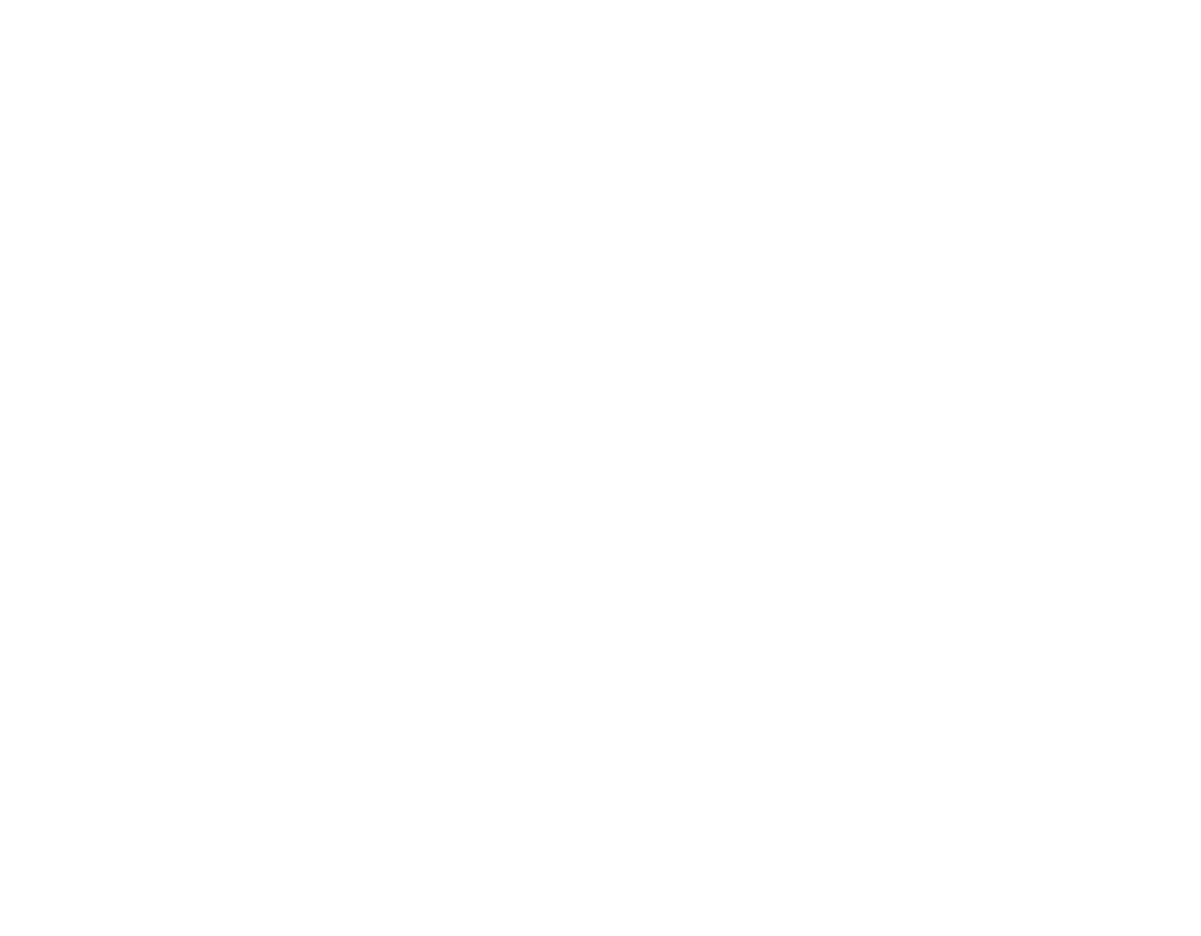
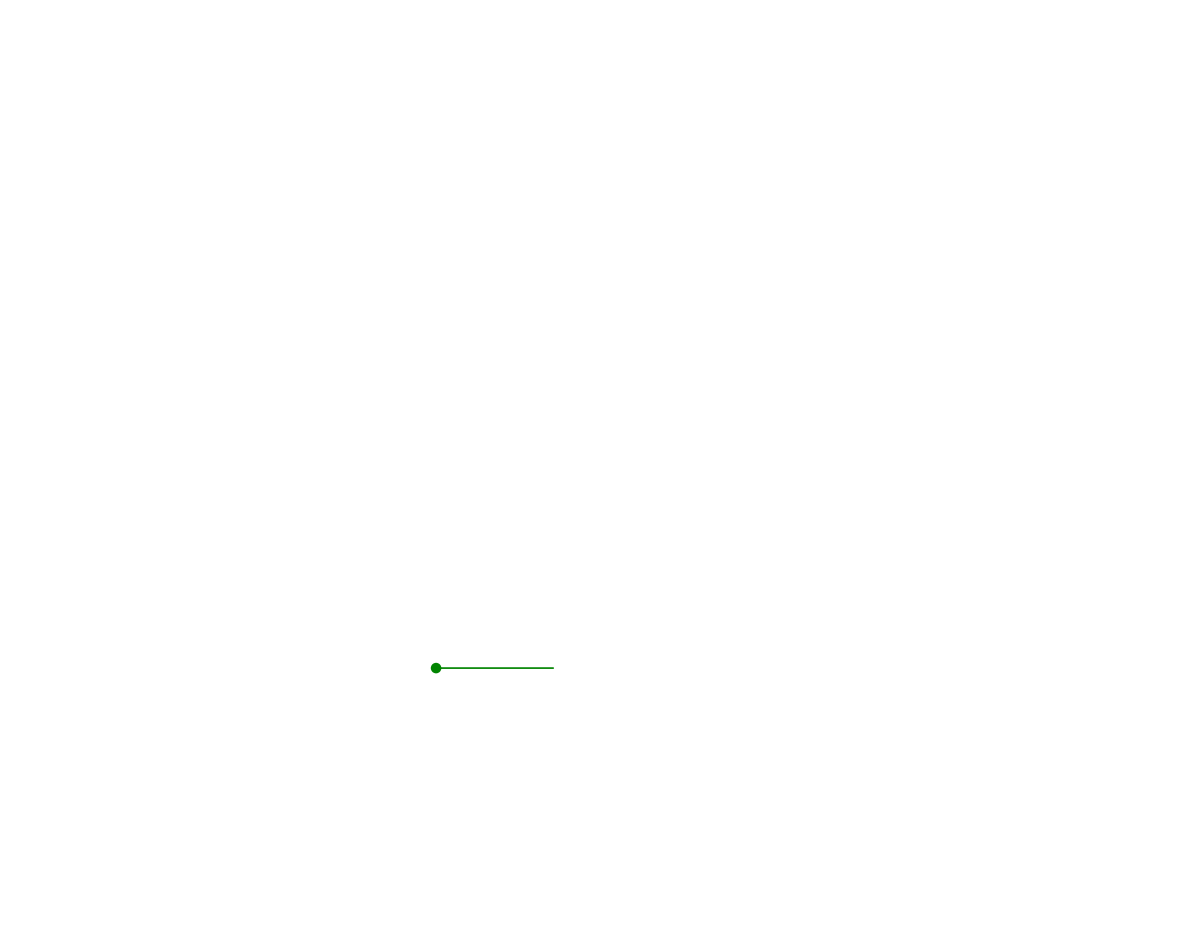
wire: none -> (436, 668) (553, 668)
junction: none -> (436, 668)

